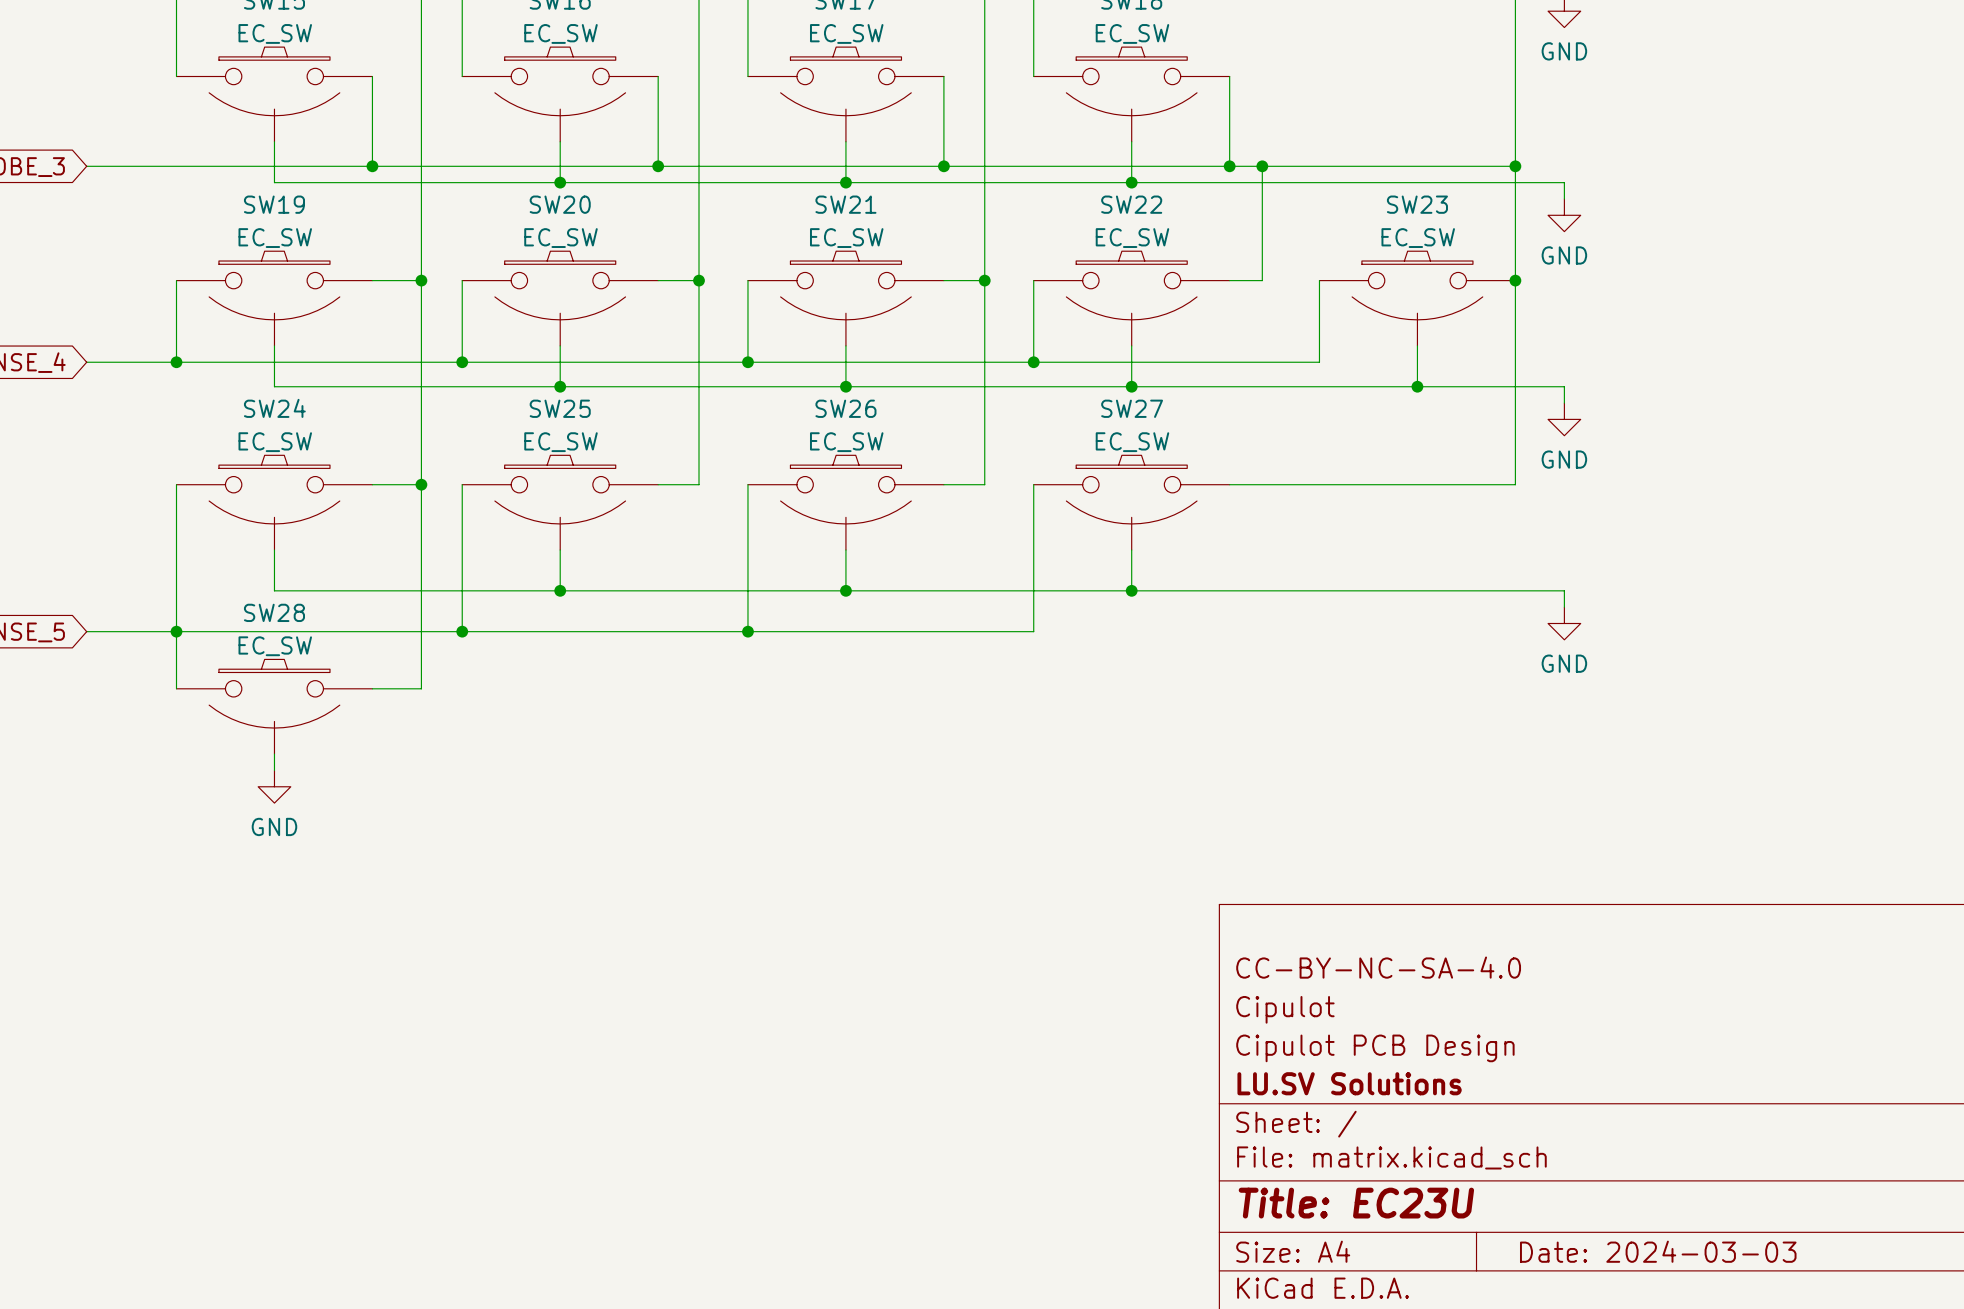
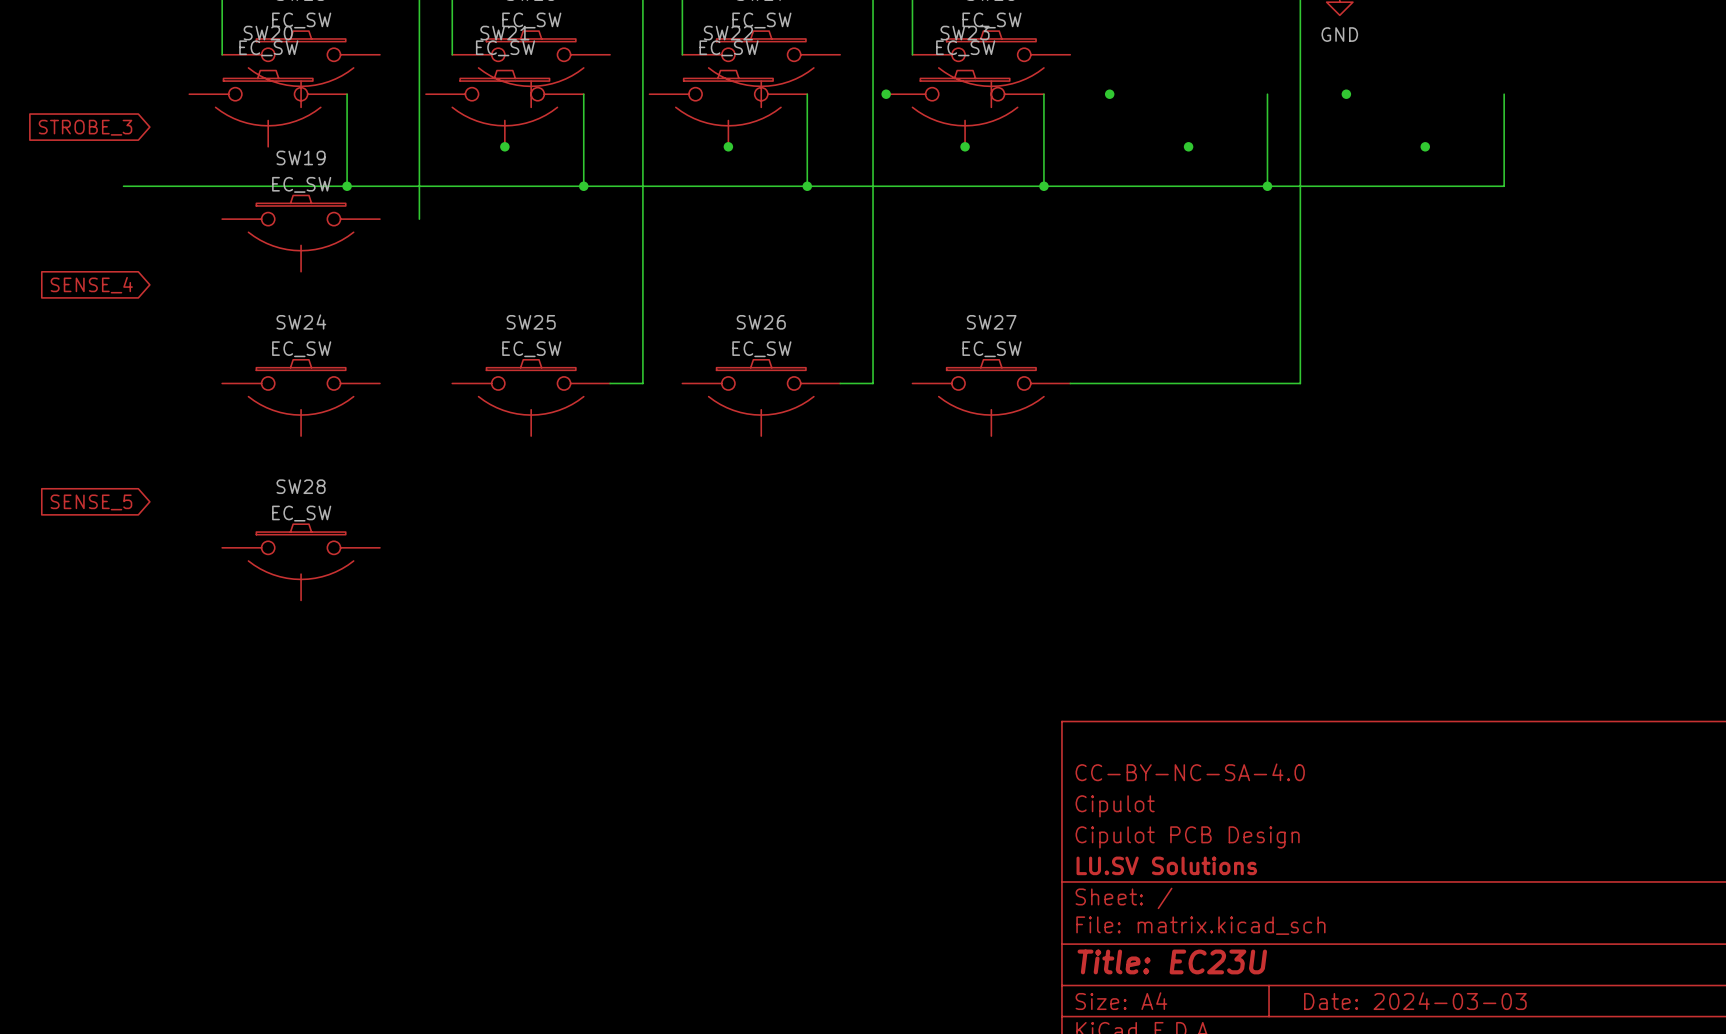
wire: (372, 76) (372, 166) -> none
wire: (658, 76) (658, 166) -> none
wire: (943, 76) (943, 166) -> none
wire: (1229, 76) (1229, 166) -> none
wire: none -> (347, 94) (347, 186)
wire: none -> (583, 94) (583, 186)
wire: none -> (807, 94) (807, 186)
junction: none -> (886, 94)
wire: none -> (1043, 94) (1043, 186)
junction: none -> (1109, 94)
wire: none -> (1267, 94) (1267, 186)
junction: none -> (1346, 94)
wire: none -> (1504, 94) (1504, 186) (123, 186)
wire: (274, 141) (274, 182) (1564, 182) (1564, 198) -> none
wire: (560, 141) (560, 182) -> none
wire: (845, 141) (845, 182) -> none
wire: (1131, 141) (1131, 182) -> none
wire: (86, 166) (1515, 166) -> none
junction: (372, 166) -> none
junction: (658, 166) -> none
junction: (943, 166) -> none
junction: (1229, 166) -> none
wire: (1262, 166) (1262, 280) (1229, 280) -> none
junction: (1262, 166) -> none
junction: (1515, 166) -> none
junction position: (560, 182) -> (504, 146)
junction: (845, 182) -> none
junction position: (1131, 182) -> (965, 146)
junction: none -> (728, 146)
junction: none -> (1188, 146)
junction: none -> (1425, 146)
power symbol: GND (1564, 215) -> none
SW20 value position: EC_SW (560, 238) -> EC_SW (268, 48)
SW21 value position: EC_SW (846, 238) -> EC_SW (505, 48)
SW22 value position: EC_SW (1132, 238) -> EC_SW (729, 48)
SW23 value position: EC_SW (1418, 238) -> EC_SW (965, 48)
junction: none -> (347, 186)
junction: none -> (583, 186)
junction: none -> (807, 186)
junction: none -> (1043, 186)
junction: none -> (1267, 186)
wire: (176, 280) (176, 362) -> none
wire: (372, 280) (421, 280) (421, 688) (372, 688) -> none
junction: (421, 280) -> none
wire: (462, 280) (462, 362) -> none
wire: (658, 280) (699, 280) -> none
junction: (699, 280) -> none
wire: (747, 280) (747, 362) -> none
wire: (943, 280) (984, 280) -> none
junction: (984, 280) -> none
wire: (1033, 280) (1033, 362) -> none
wire: (1319, 280) (1319, 362) (86, 362) -> none
junction: (1515, 280) -> none
SW20 position: (560, 298) -> (268, 108)
SW21 position: (845, 298) -> (504, 108)
SW22 position: (1131, 298) -> (728, 108)
SW23 position: (1417, 298) -> (965, 108)
wire: (274, 345) (274, 386) (1564, 386) (1564, 403) -> none
wire: (560, 345) (560, 386) -> none
wire: (845, 345) (845, 386) -> none
wire: (1131, 345) (1131, 386) -> none
wire: (1417, 345) (1417, 386) -> none
junction: (176, 362) -> none
junction: (462, 362) -> none
junction: (747, 362) -> none
junction: (1033, 362) -> none
junction: (560, 386) -> none
junction: (845, 386) -> none
junction: (1131, 386) -> none
junction: (1417, 386) -> none
power symbol: GND (1564, 419) -> none
wire: (176, 484) (176, 688) -> none
wire: (372, 484) (421, 484) -> none
junction: (421, 484) -> none
wire: (462, 484) (462, 631) -> none
wire: (747, 484) (747, 631) -> none
wire: (1033, 484) (1033, 631) (86, 631) -> none
wire: (274, 550) (274, 590) (1564, 590) (1564, 607) -> none
wire: (560, 550) (560, 590) -> none
wire: (845, 550) (845, 590) -> none
wire: (1131, 550) (1131, 590) -> none
junction: (560, 590) -> none
junction: (845, 590) -> none
junction: (1131, 590) -> none
power symbol: GND (1564, 623) -> none
junction: (176, 631) -> none
junction: (462, 631) -> none
junction: (747, 631) -> none
wire: (274, 754) (274, 770) -> none
power symbol: GND (274, 786) -> none

